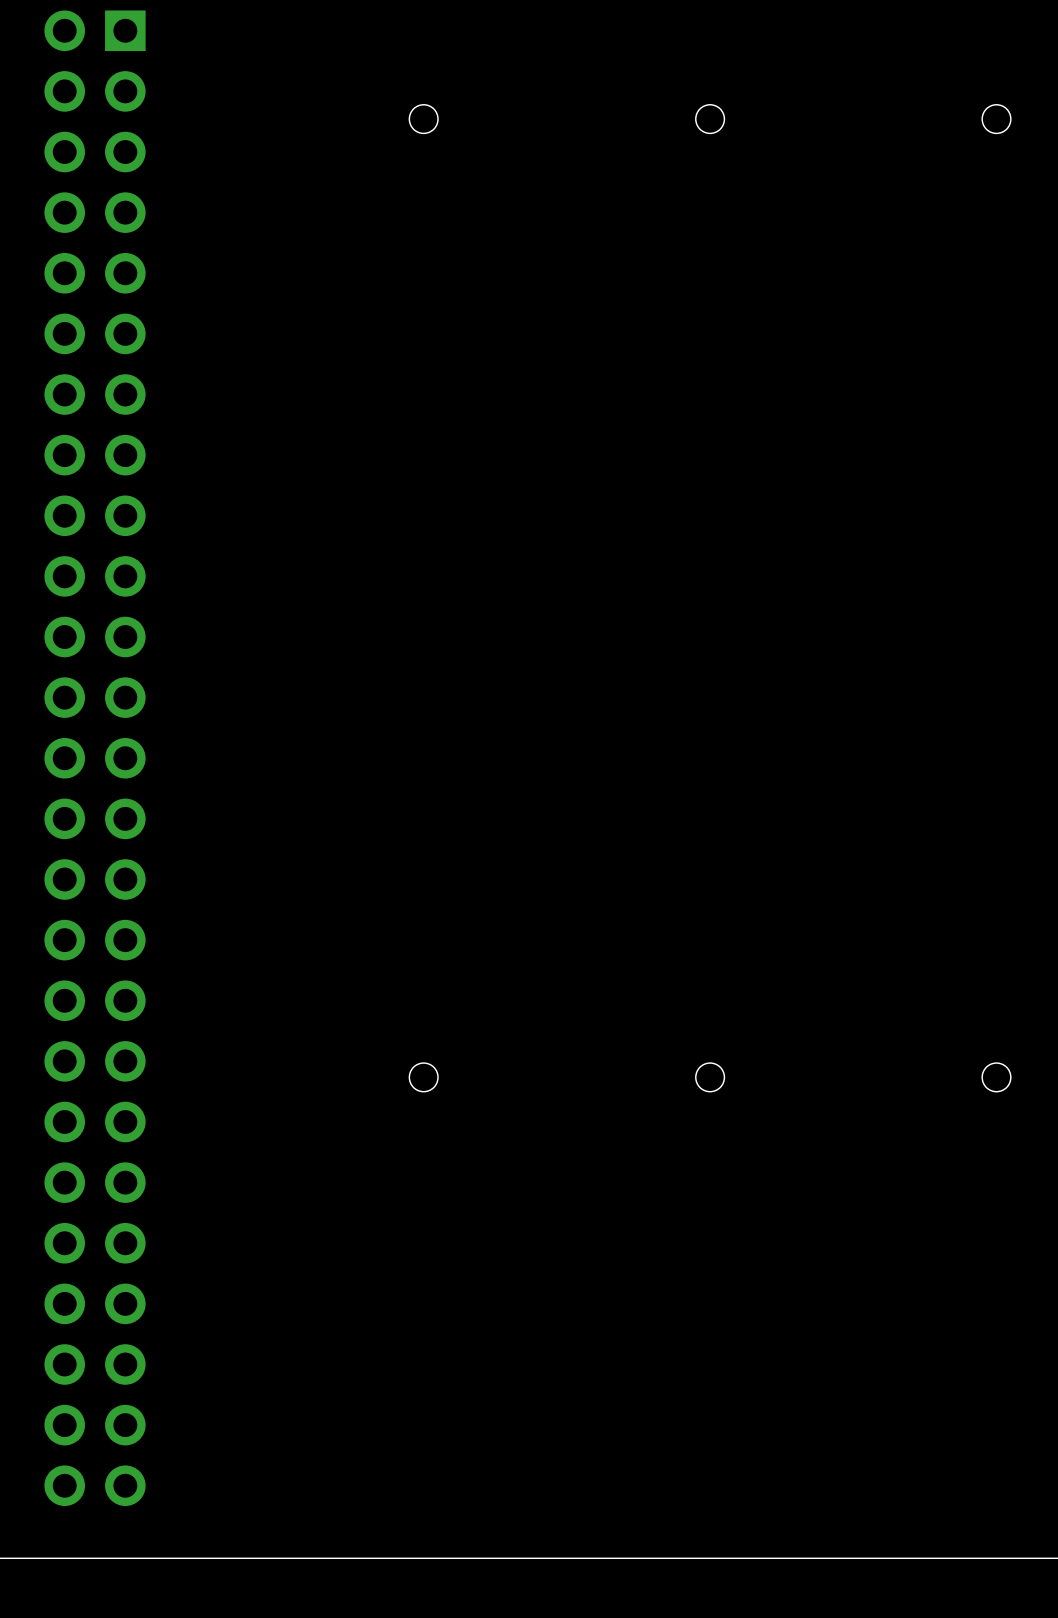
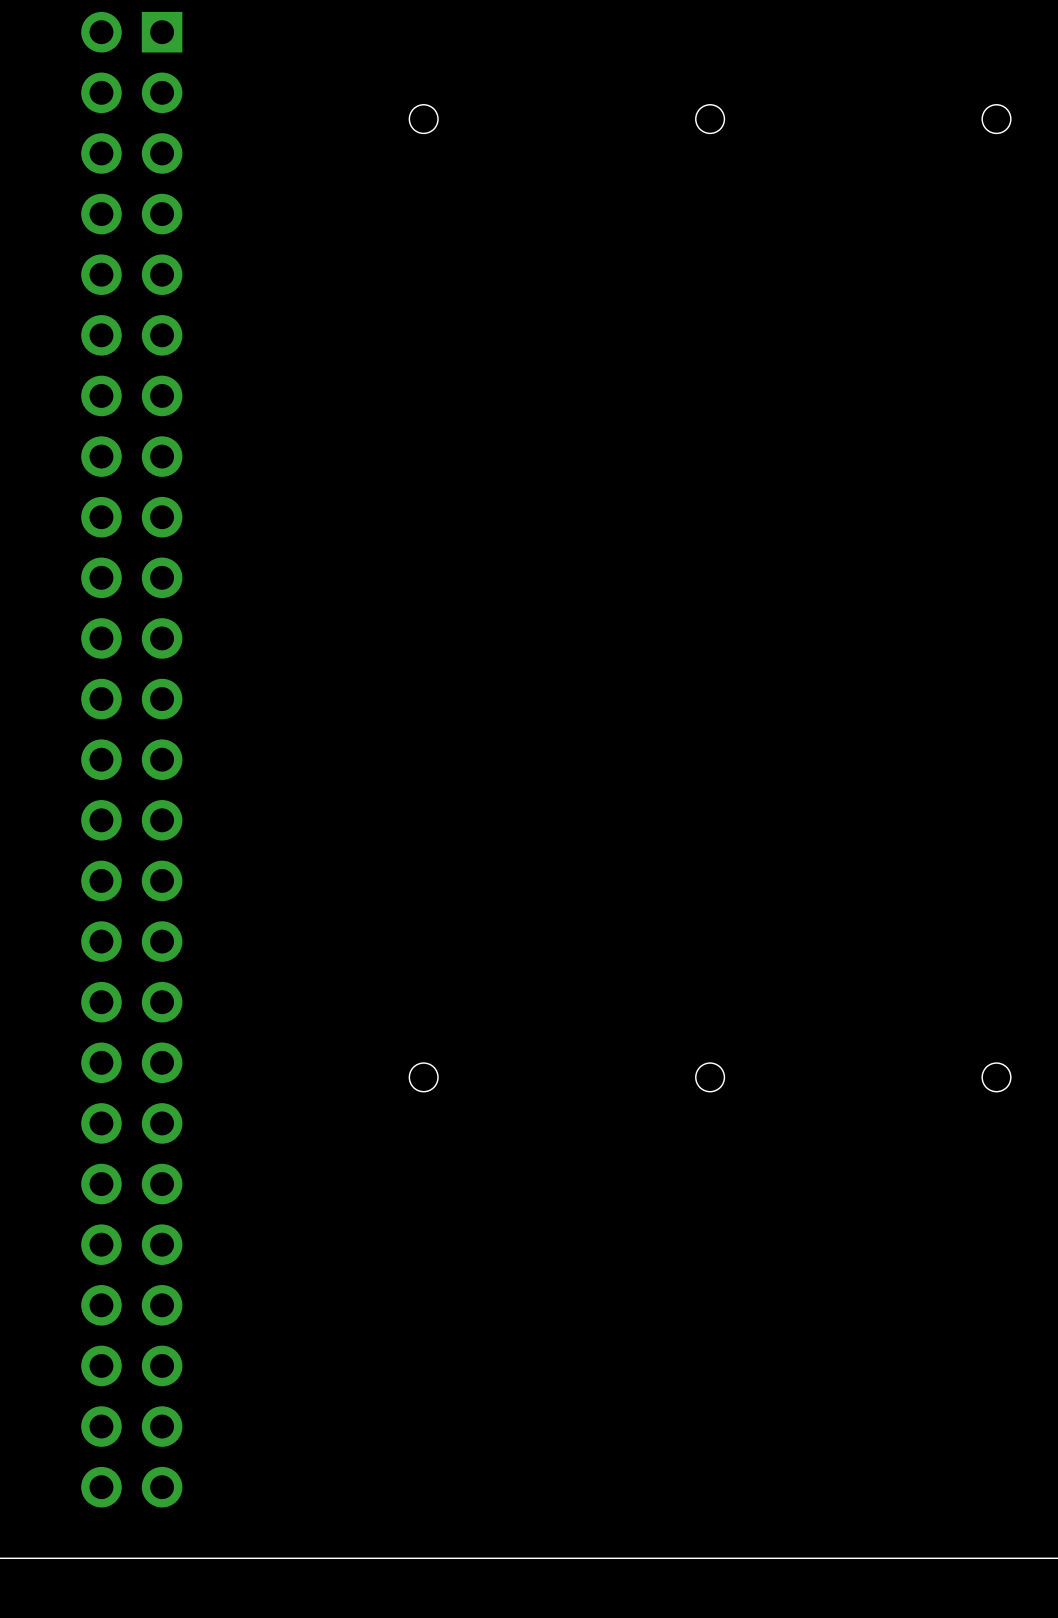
part position: (95, 758) -> (131, 759)

